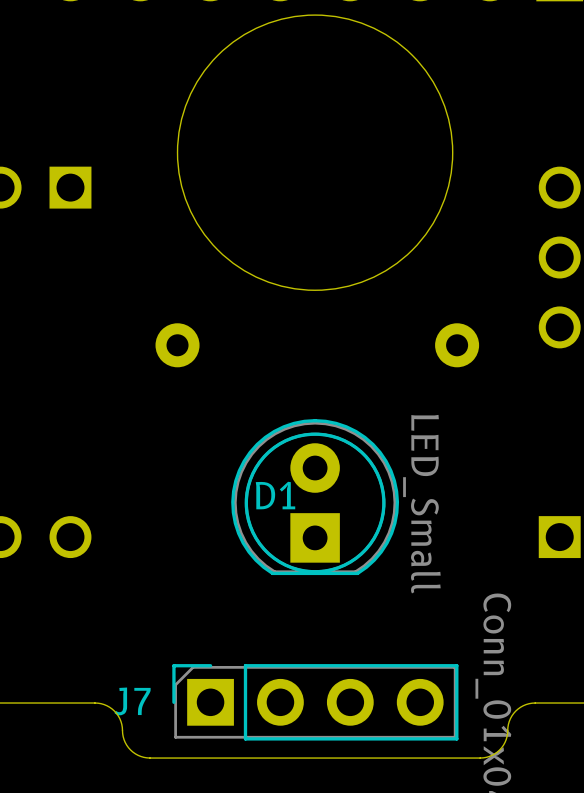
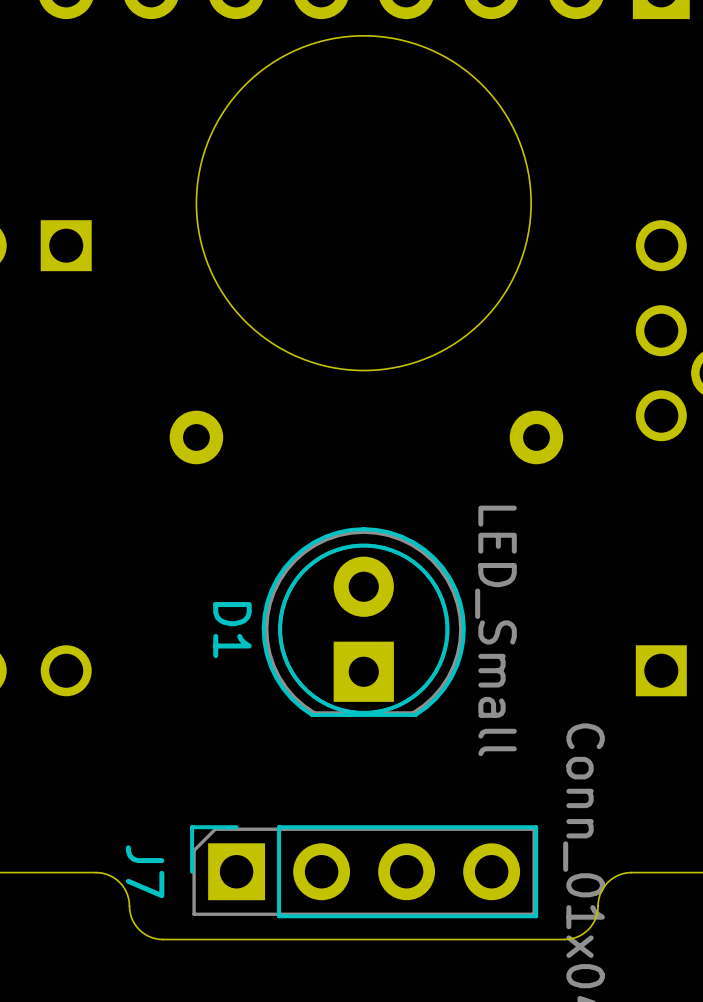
D1 name rotation: 0° (275, 495) -> 90° clockwise (232, 630)
D1 name position: D1 (275, 495) -> D1 (232, 630)
J7 name rotation: 0° (132, 701) -> 90° clockwise (145, 871)

